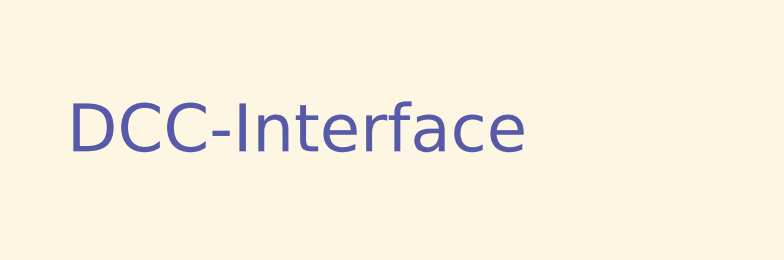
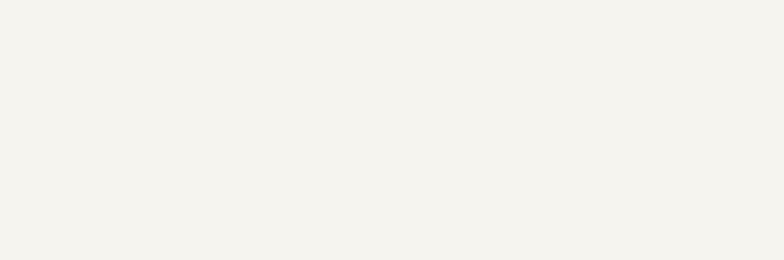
text: DCC-Interface (298, 126) -> none

